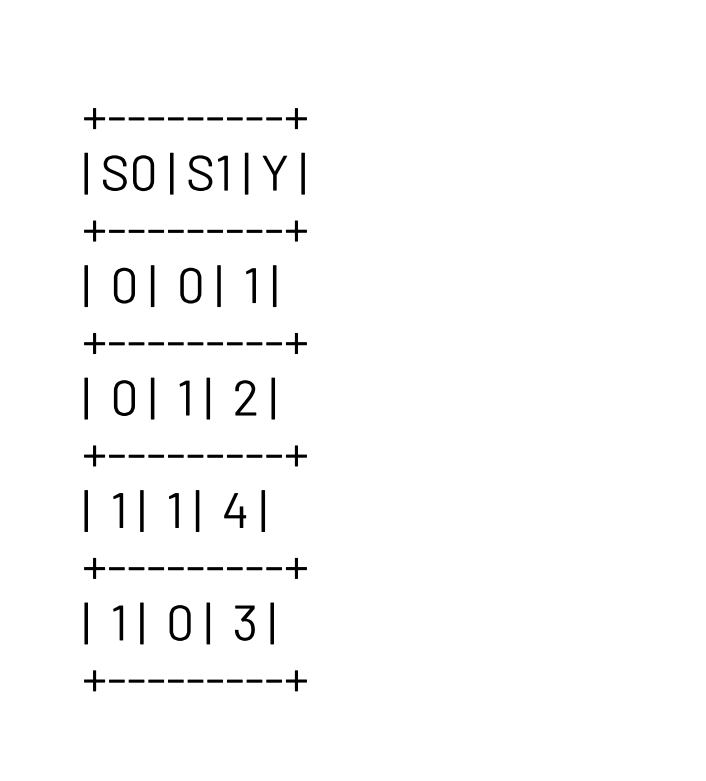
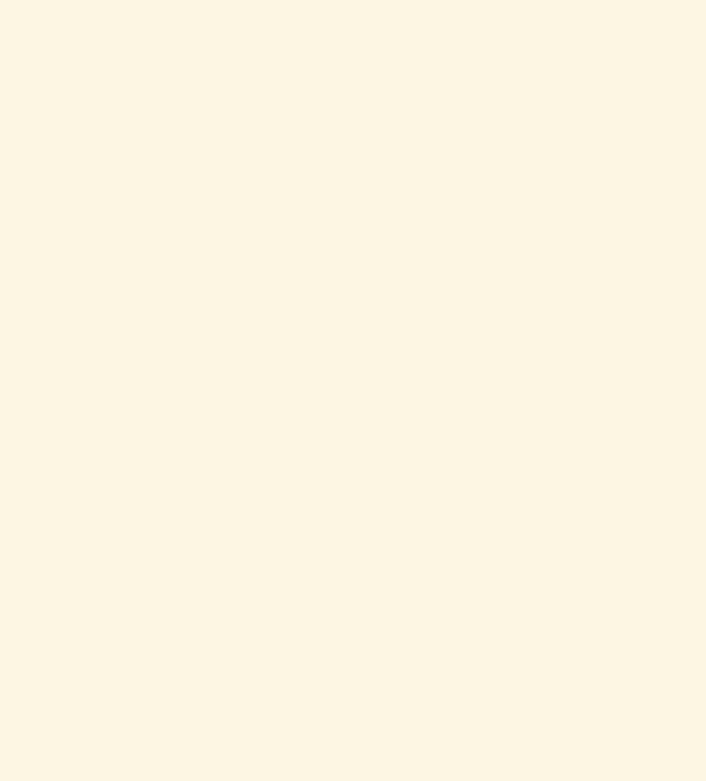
text: +---------+ (195, 118) -> none
text: | S0 | S1 | Y | (194, 173) -> none
text: +---------+ (195, 231) -> none
text: | 0 | 0 | 1 | (180, 286) -> none
text: +---------+ (195, 343) -> none
text: | 0 | 1 | 2 | (179, 398) -> none
text: +---------+ (195, 455) -> none
text: | 1 | 1 | 4 | (174, 511) -> none
text: +---------+ (195, 568) -> none
text: | 1 | 0 | 3 | (179, 623) -> none
text: +---------+ (195, 680) -> none

